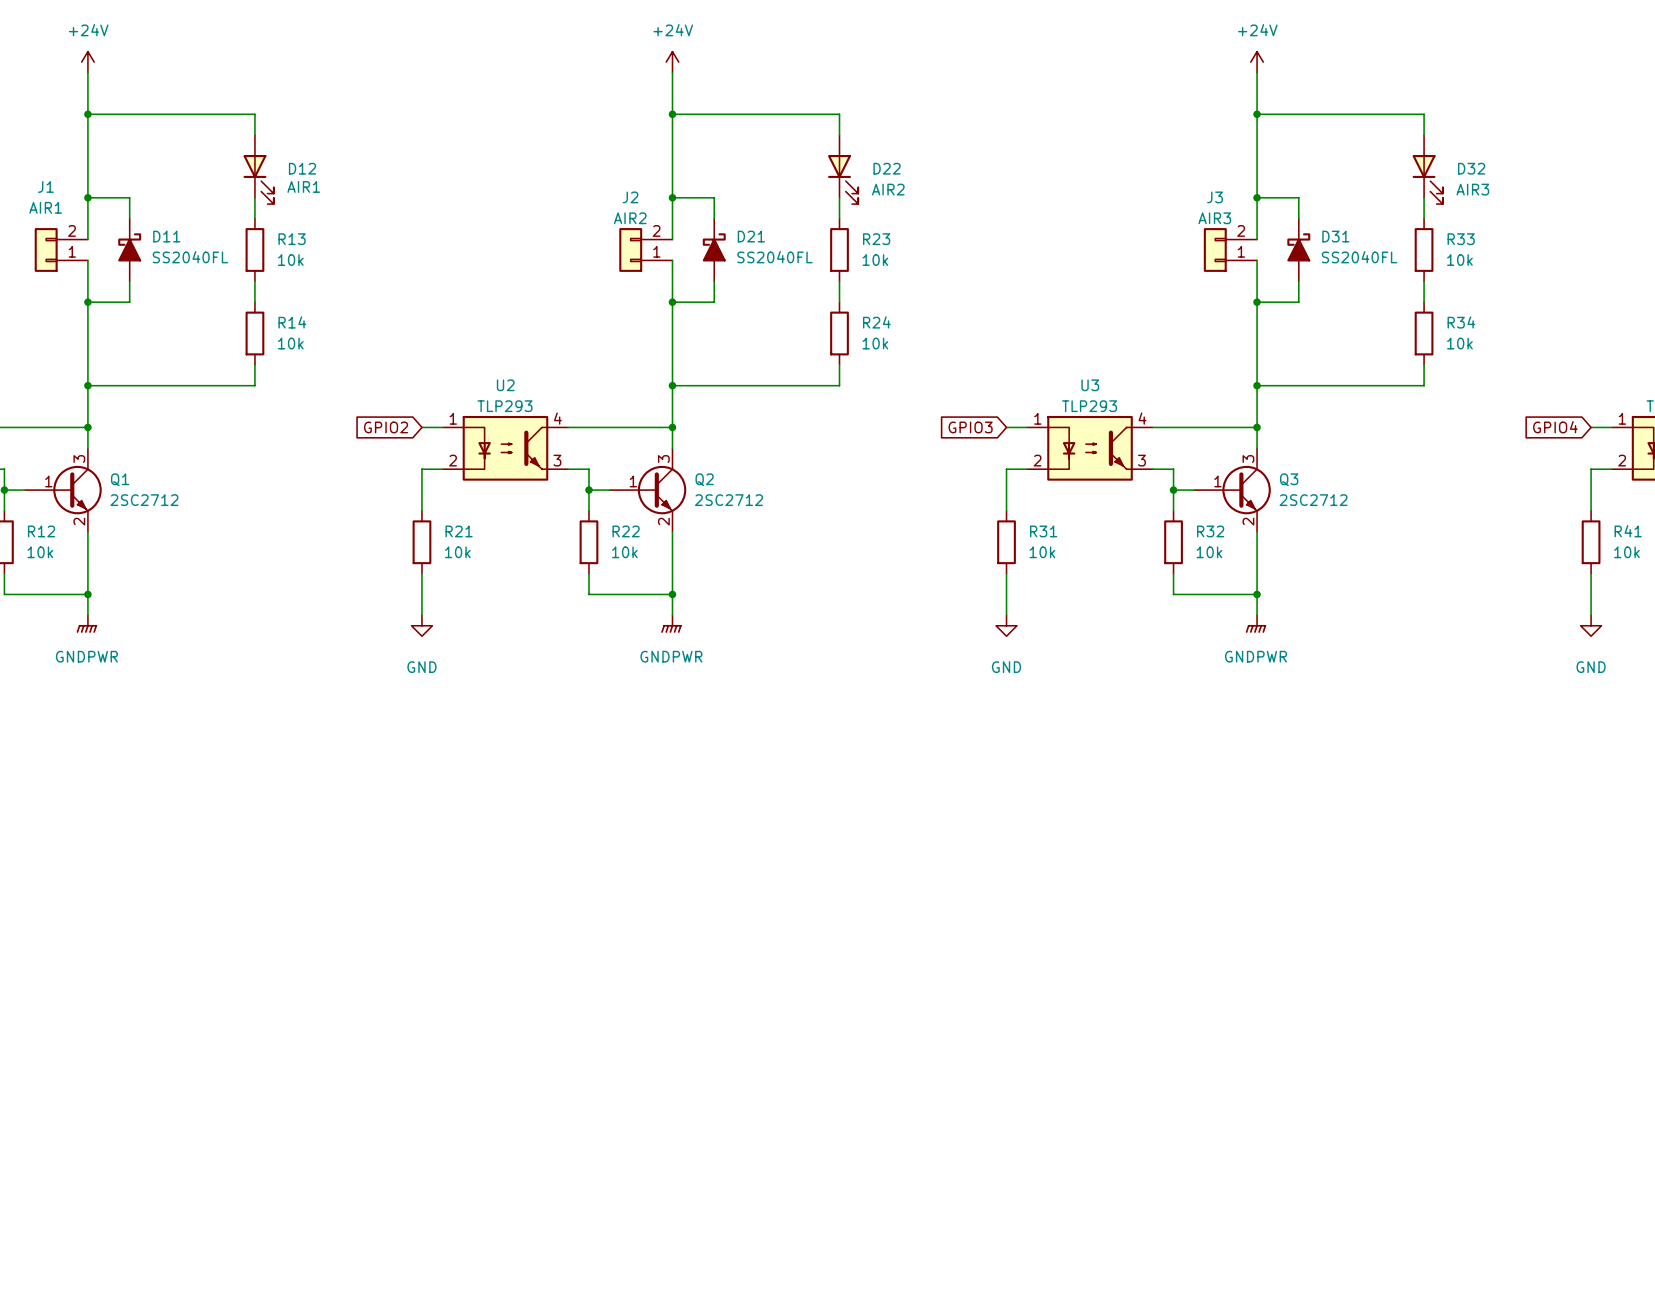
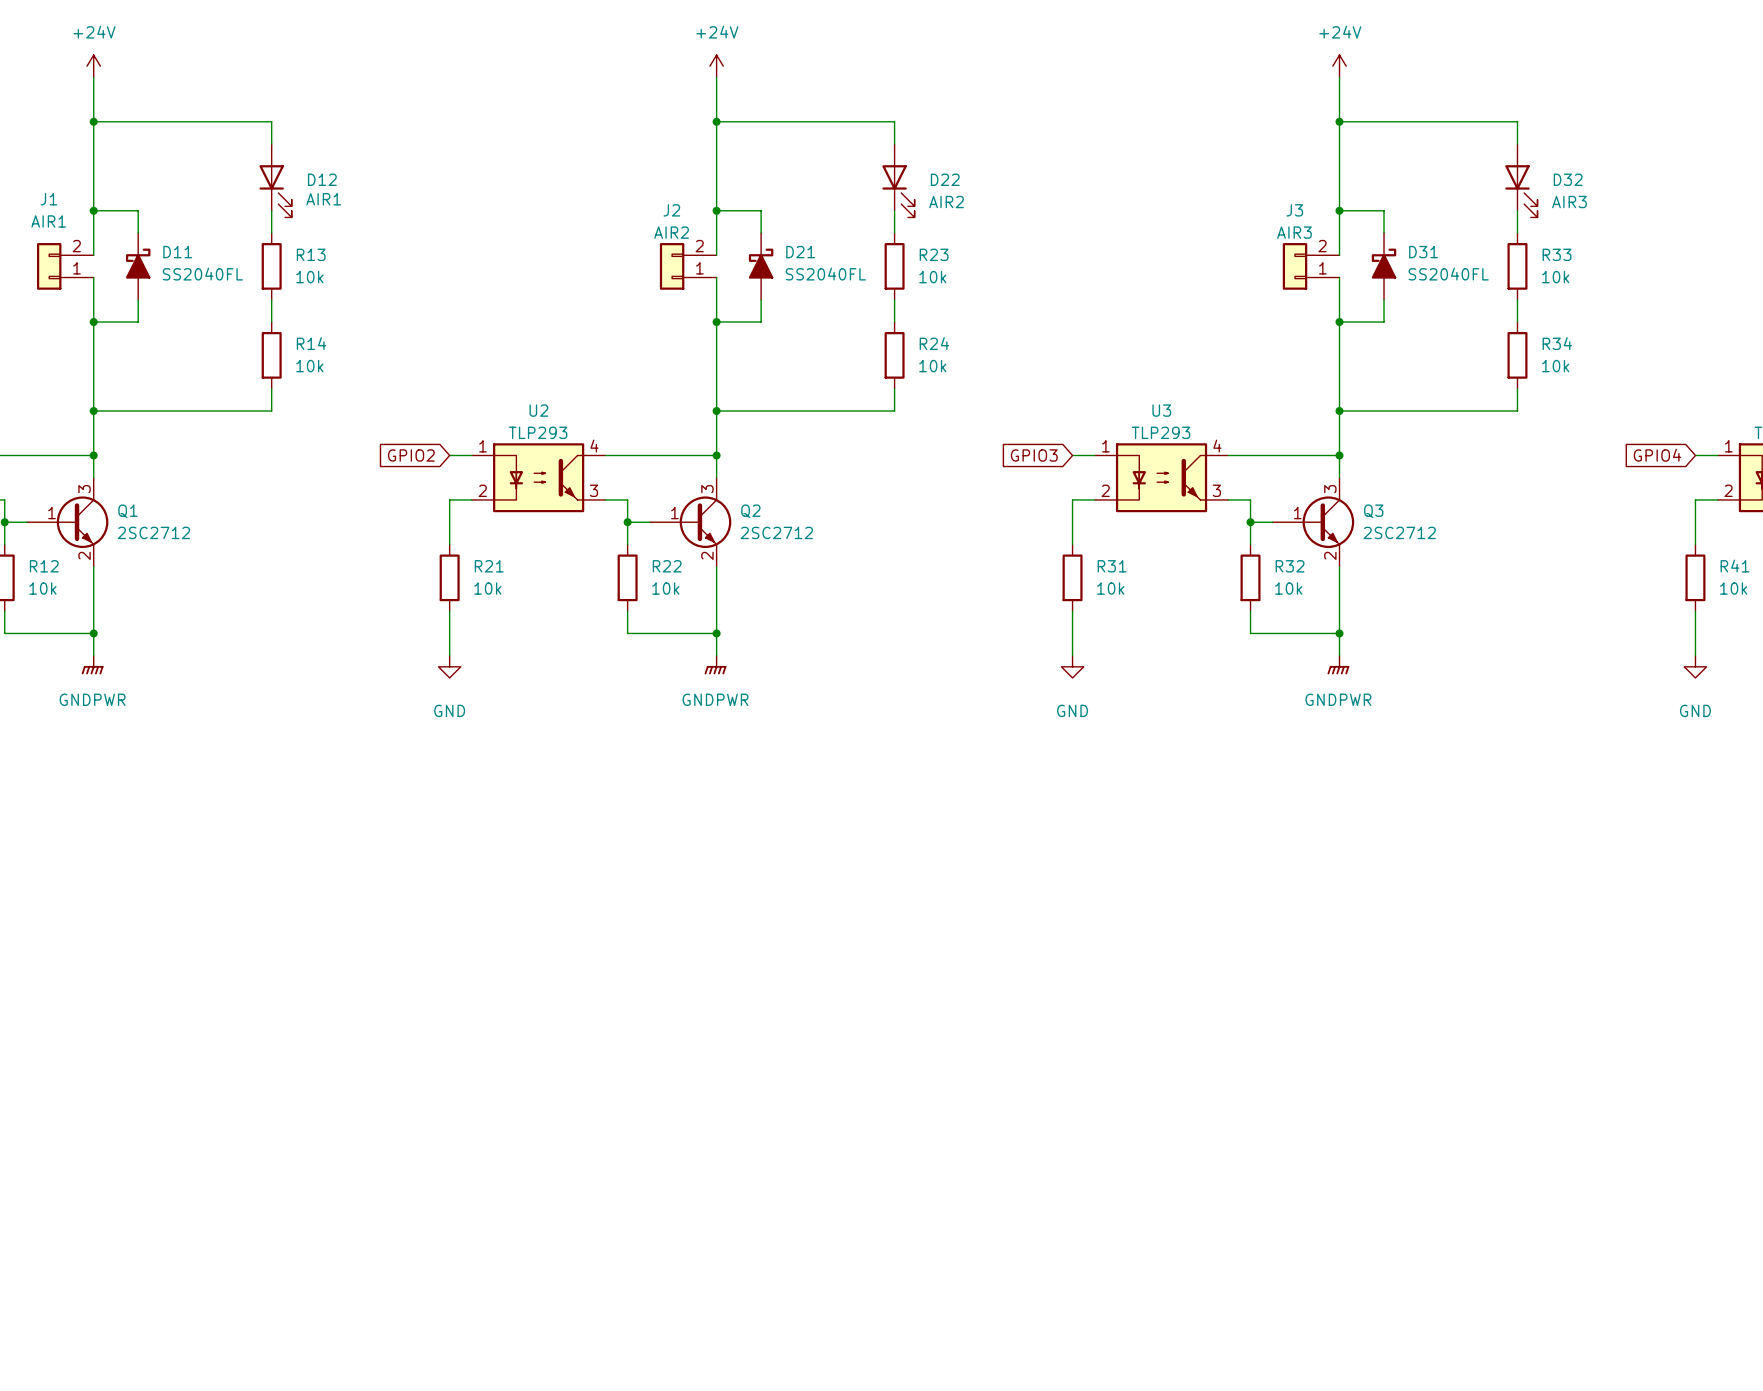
D12 symbol: [243, 135, 274, 205] -> [259, 144, 292, 218]
D22 symbol: [828, 135, 859, 205] -> [882, 144, 915, 218]
D32 symbol: [1412, 135, 1443, 205] -> [1505, 144, 1538, 218]

